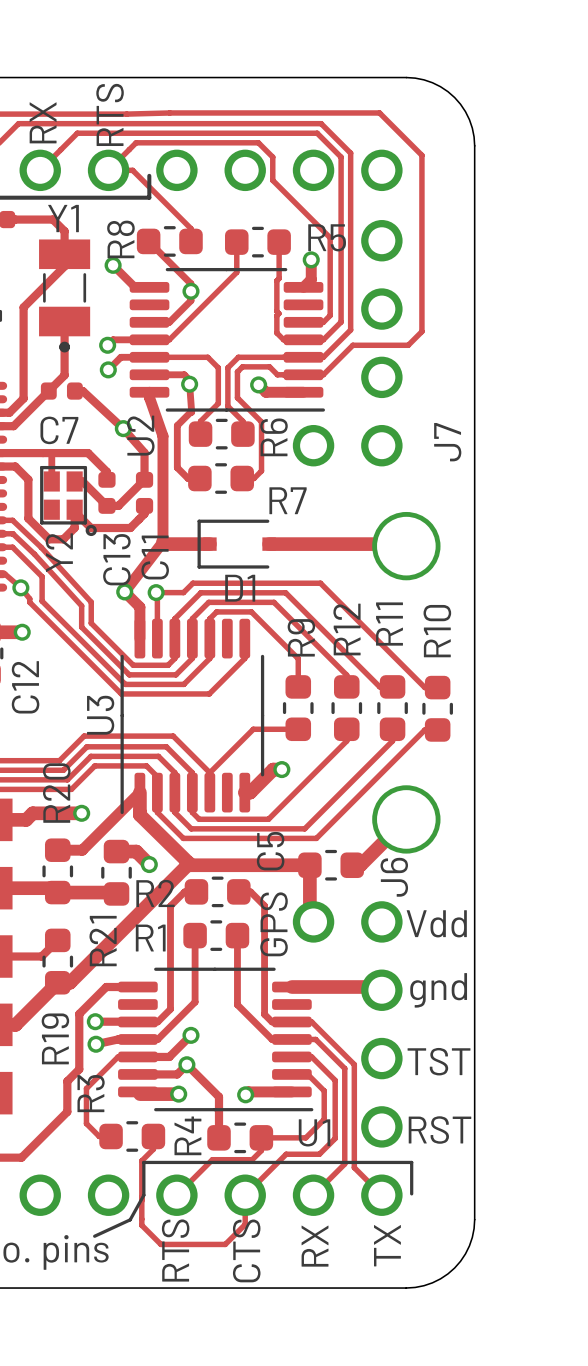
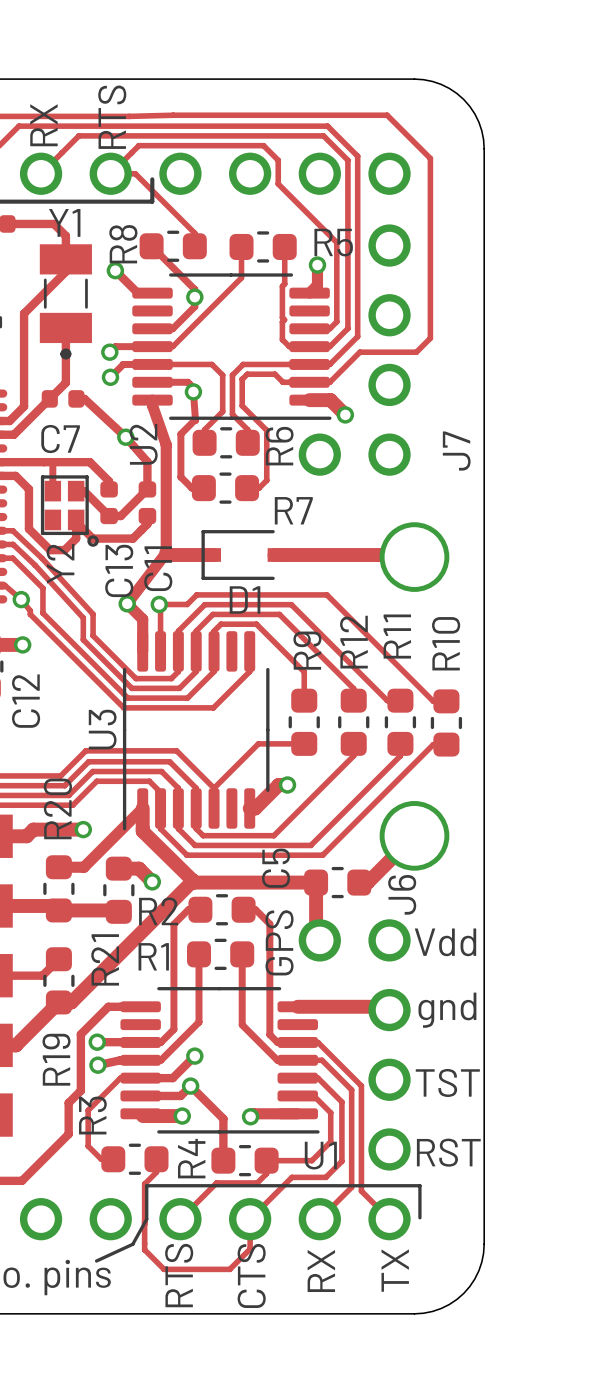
track: (258, 384) (265, 392) (303, 392) -> (345, 414) (330, 400) (309, 400)
via position: (258, 384) -> (345, 414)

